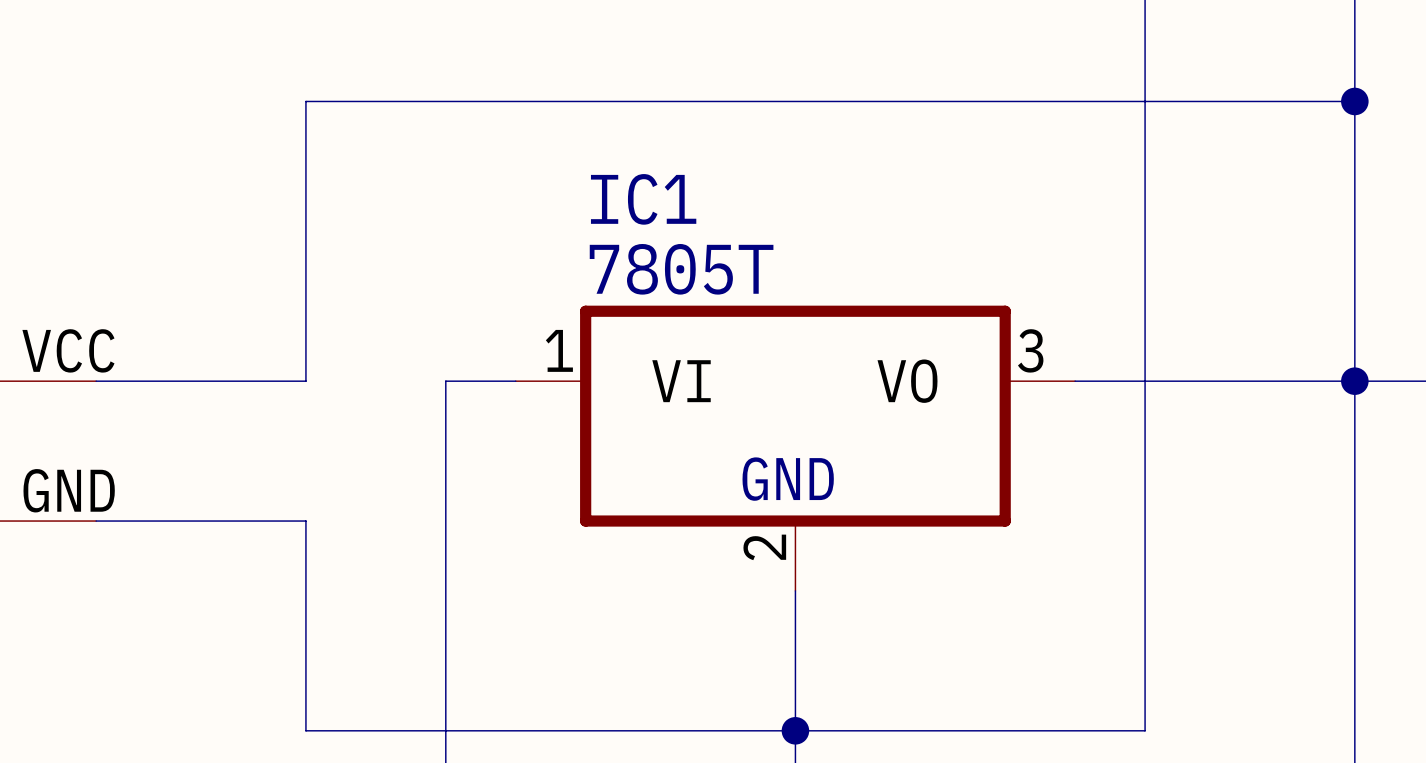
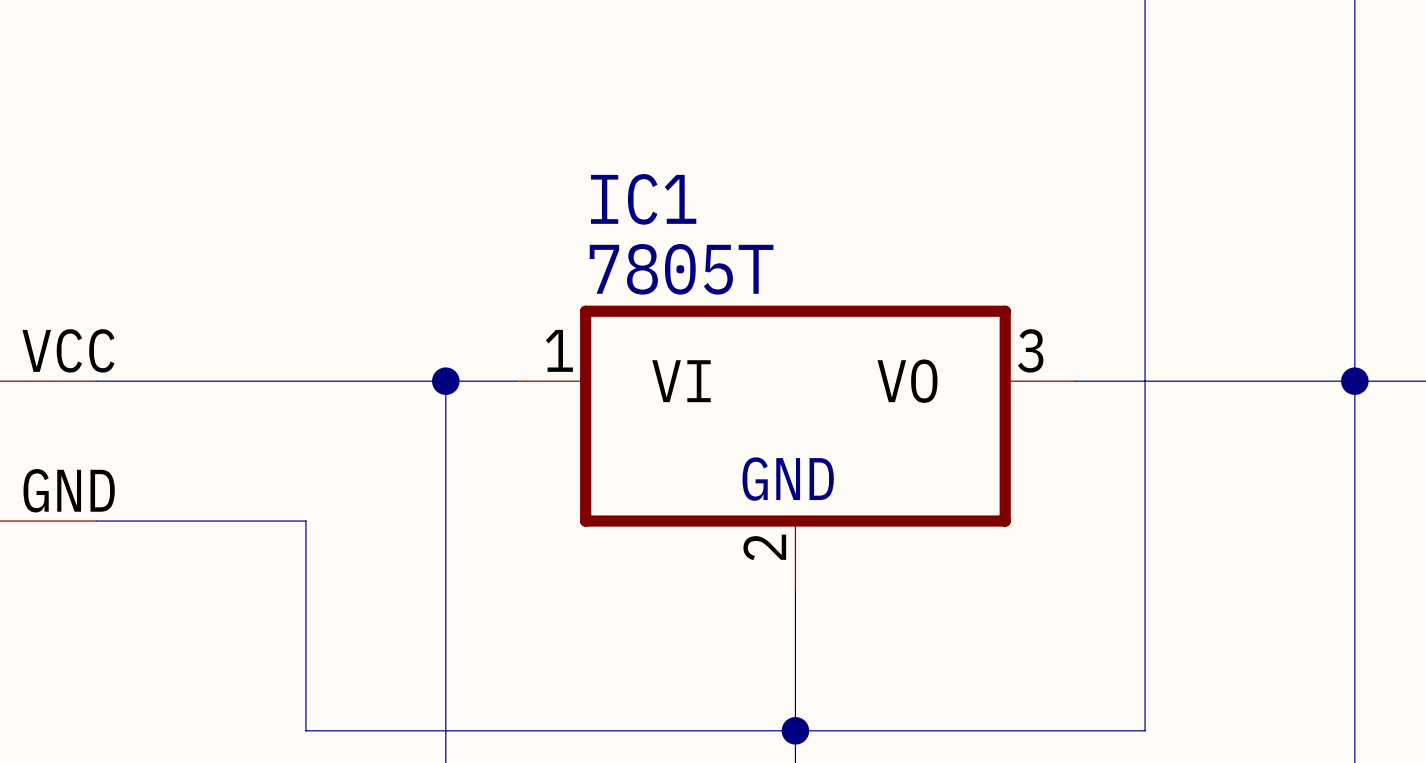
wire: (1354, 101) (305, 101) (305, 381) -> (445, 381) (305, 381)
junction: (1354, 101) -> none
junction: none -> (445, 381)

